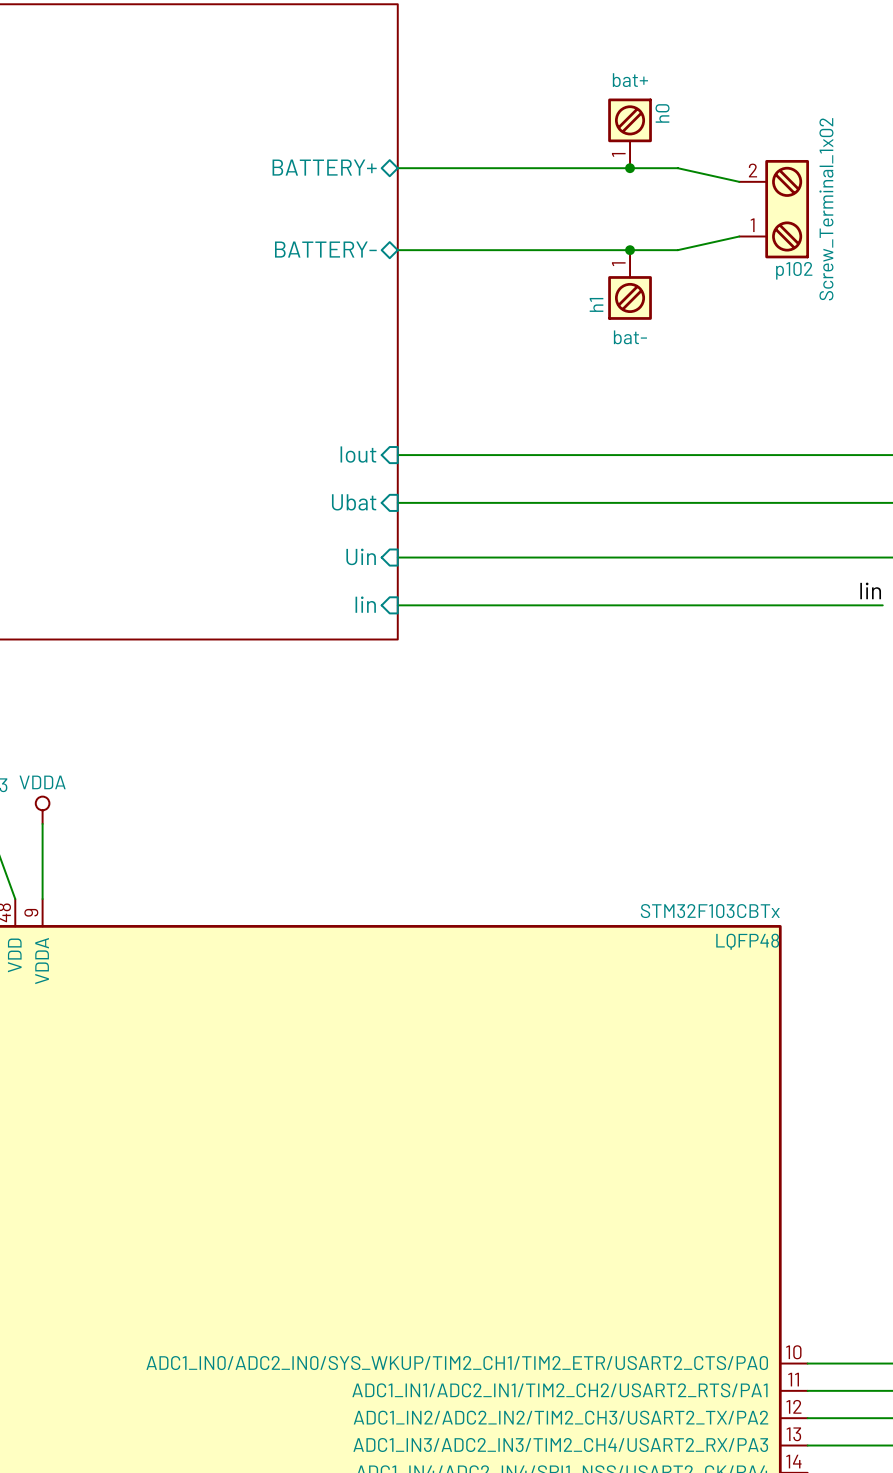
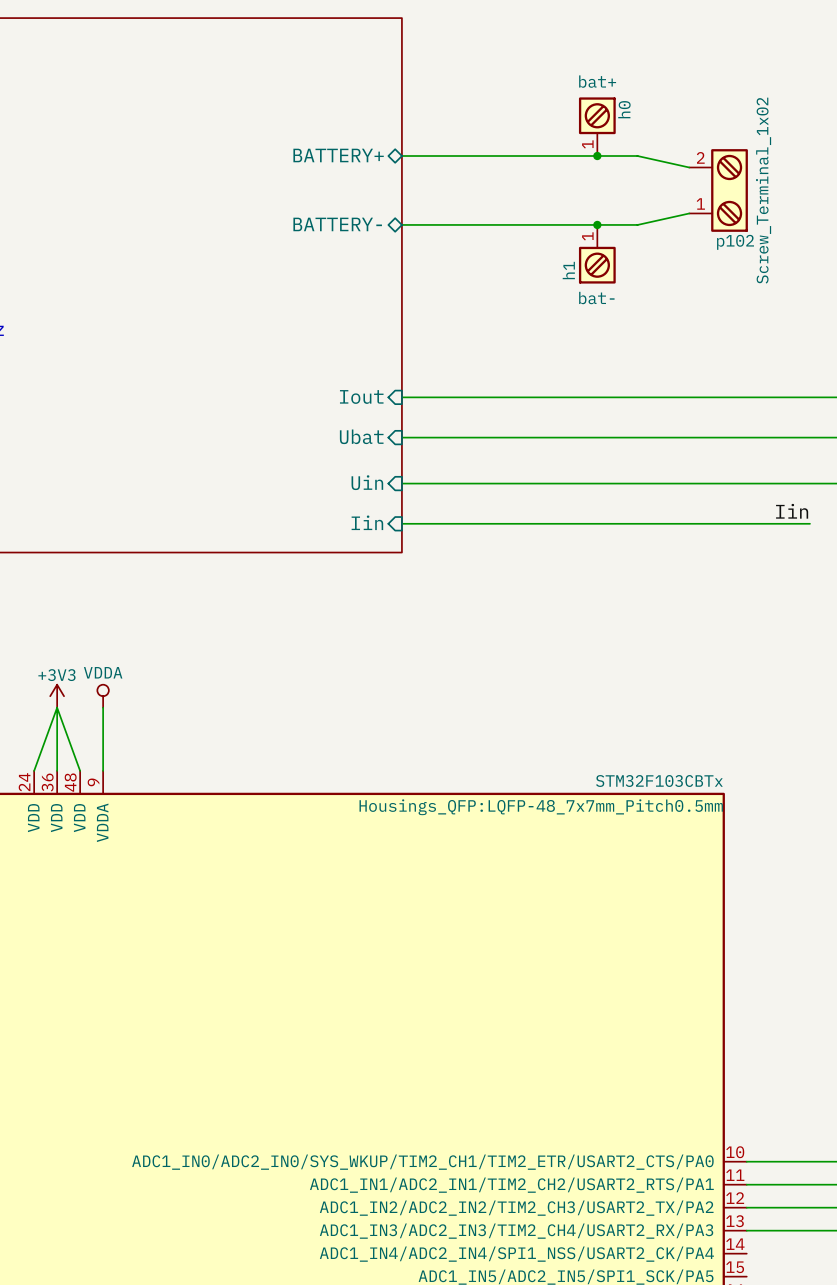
part text: LQFP48 (747, 941) -> Housings_QFP:LQFP-48_7x7mm_Pitch0.5mm (541, 807)

